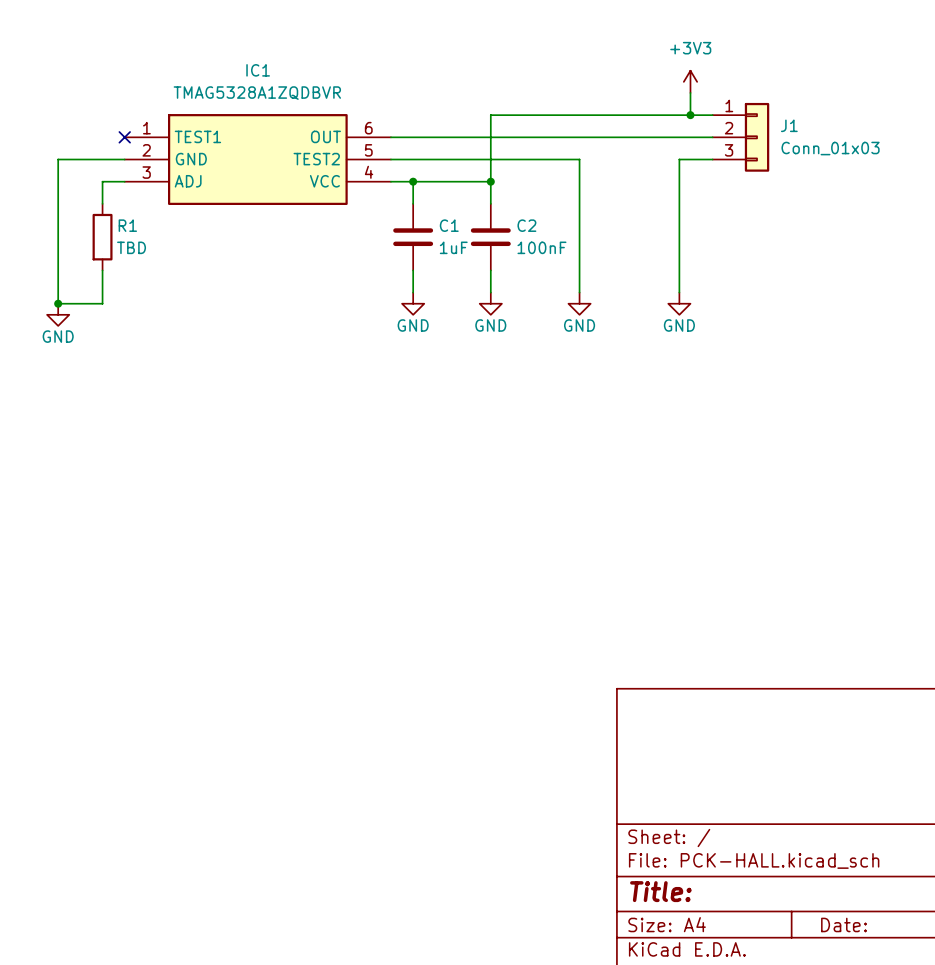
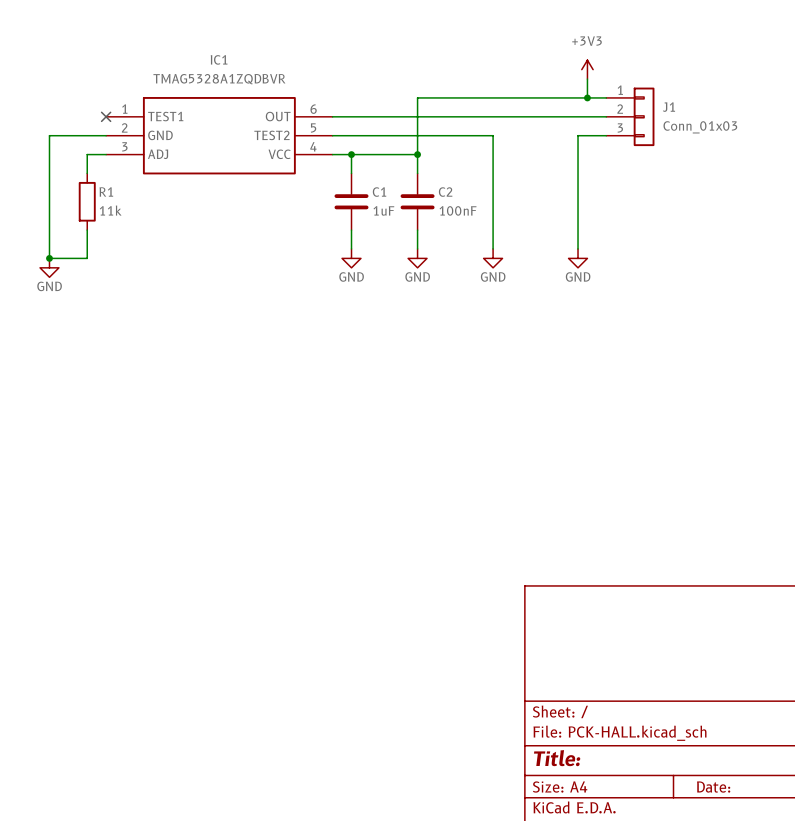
R1 value: TBD (131, 247) -> 11k (110, 210)

